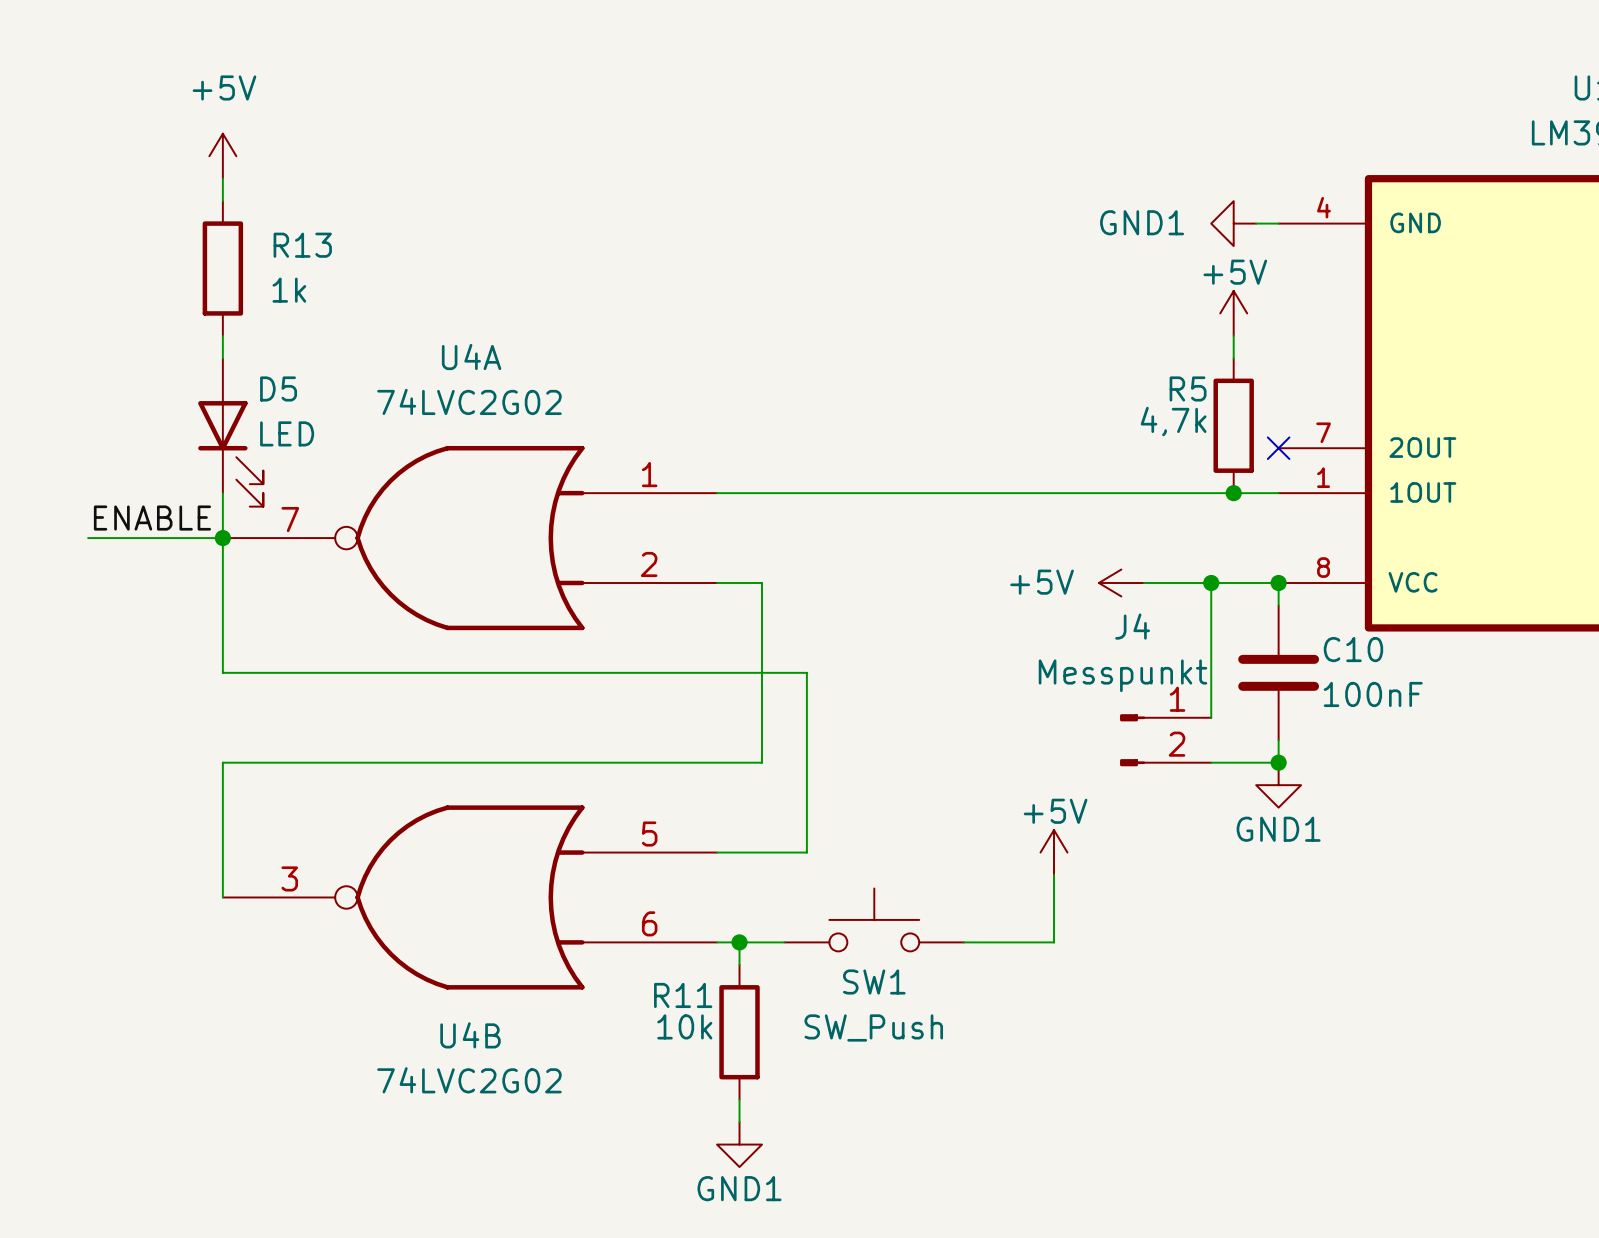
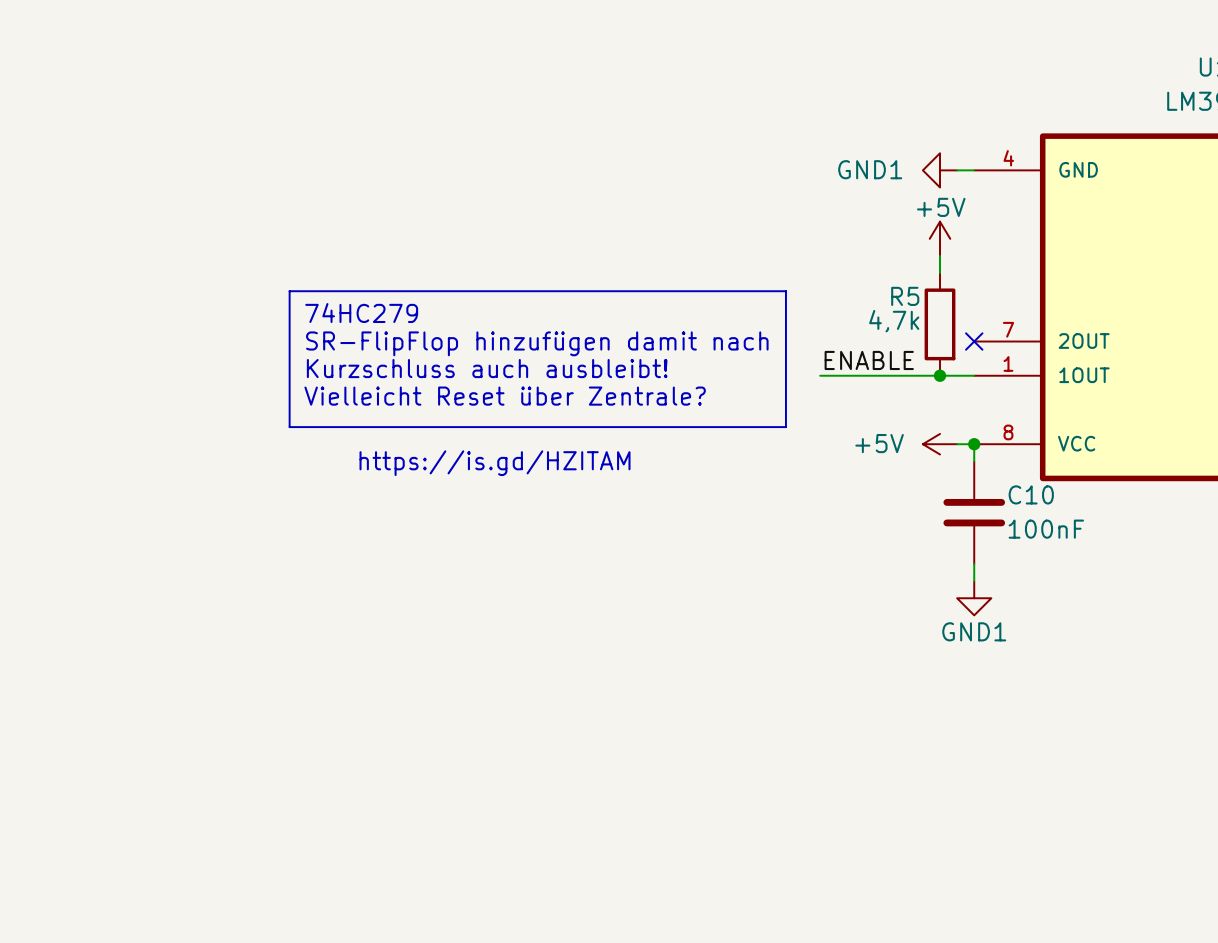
power symbol: +5V (222, 156) -> none
wire: (222, 178) (222, 201) -> none
R13: 1k (222, 268) -> none
wire: (222, 335) (222, 358) -> none
line: none -> (289, 291) (785, 291) (785, 427) (289, 427) (289, 291)
text: none -> 74HC279 (361, 313)
D5: LED (230, 432) -> none
text: none -> SR-FlipFlop hinzufügen damit nach (537, 343)
label: none -> ENABLE (869, 360)
text: none -> Kurzschluss auch ausbleibt! (487, 368)
wire: (222, 493) (222, 672) (806, 672) (806, 852) (717, 852) -> none
wire: (717, 493) (1076, 493) -> none
label: ENABLE (152, 518) -> none
text: none -> Vielleicht Reset über Zentrale? (505, 396)
wire: (88, 538) (222, 538) -> none
junction: (222, 538) -> none
U4A: 74LVC2G02 (469, 538) -> none
wire: (717, 582) (761, 582) (761, 762) (222, 762) (222, 897) -> none
power symbol position: +5V (1121, 582) -> +5V (940, 444)
wire: (1143, 582) (1256, 582) -> none
wire: (1211, 582) (1211, 717) -> none
junction: (1211, 582) -> none
text: none -> https://is.gd/HZITAM (495, 463)
J4: Messpunkt (1165, 740) -> none
wire: (1211, 762) (1278, 762) -> none
junction: (1278, 762) -> none
power symbol: +5V (1053, 852) -> none
wire: (1053, 875) (1053, 942) (964, 942) -> none
U4B: 74LVC2G02 (469, 897) -> none
SW1: SW_Push (874, 919) -> none
wire: (717, 942) (784, 942) -> none
wire: (739, 942) (739, 964) -> none
junction: (739, 942) -> none
R11: 10k (739, 1032) -> none
wire: (739, 1099) (739, 1122) -> none
power symbol: GND1 (739, 1144) -> none

